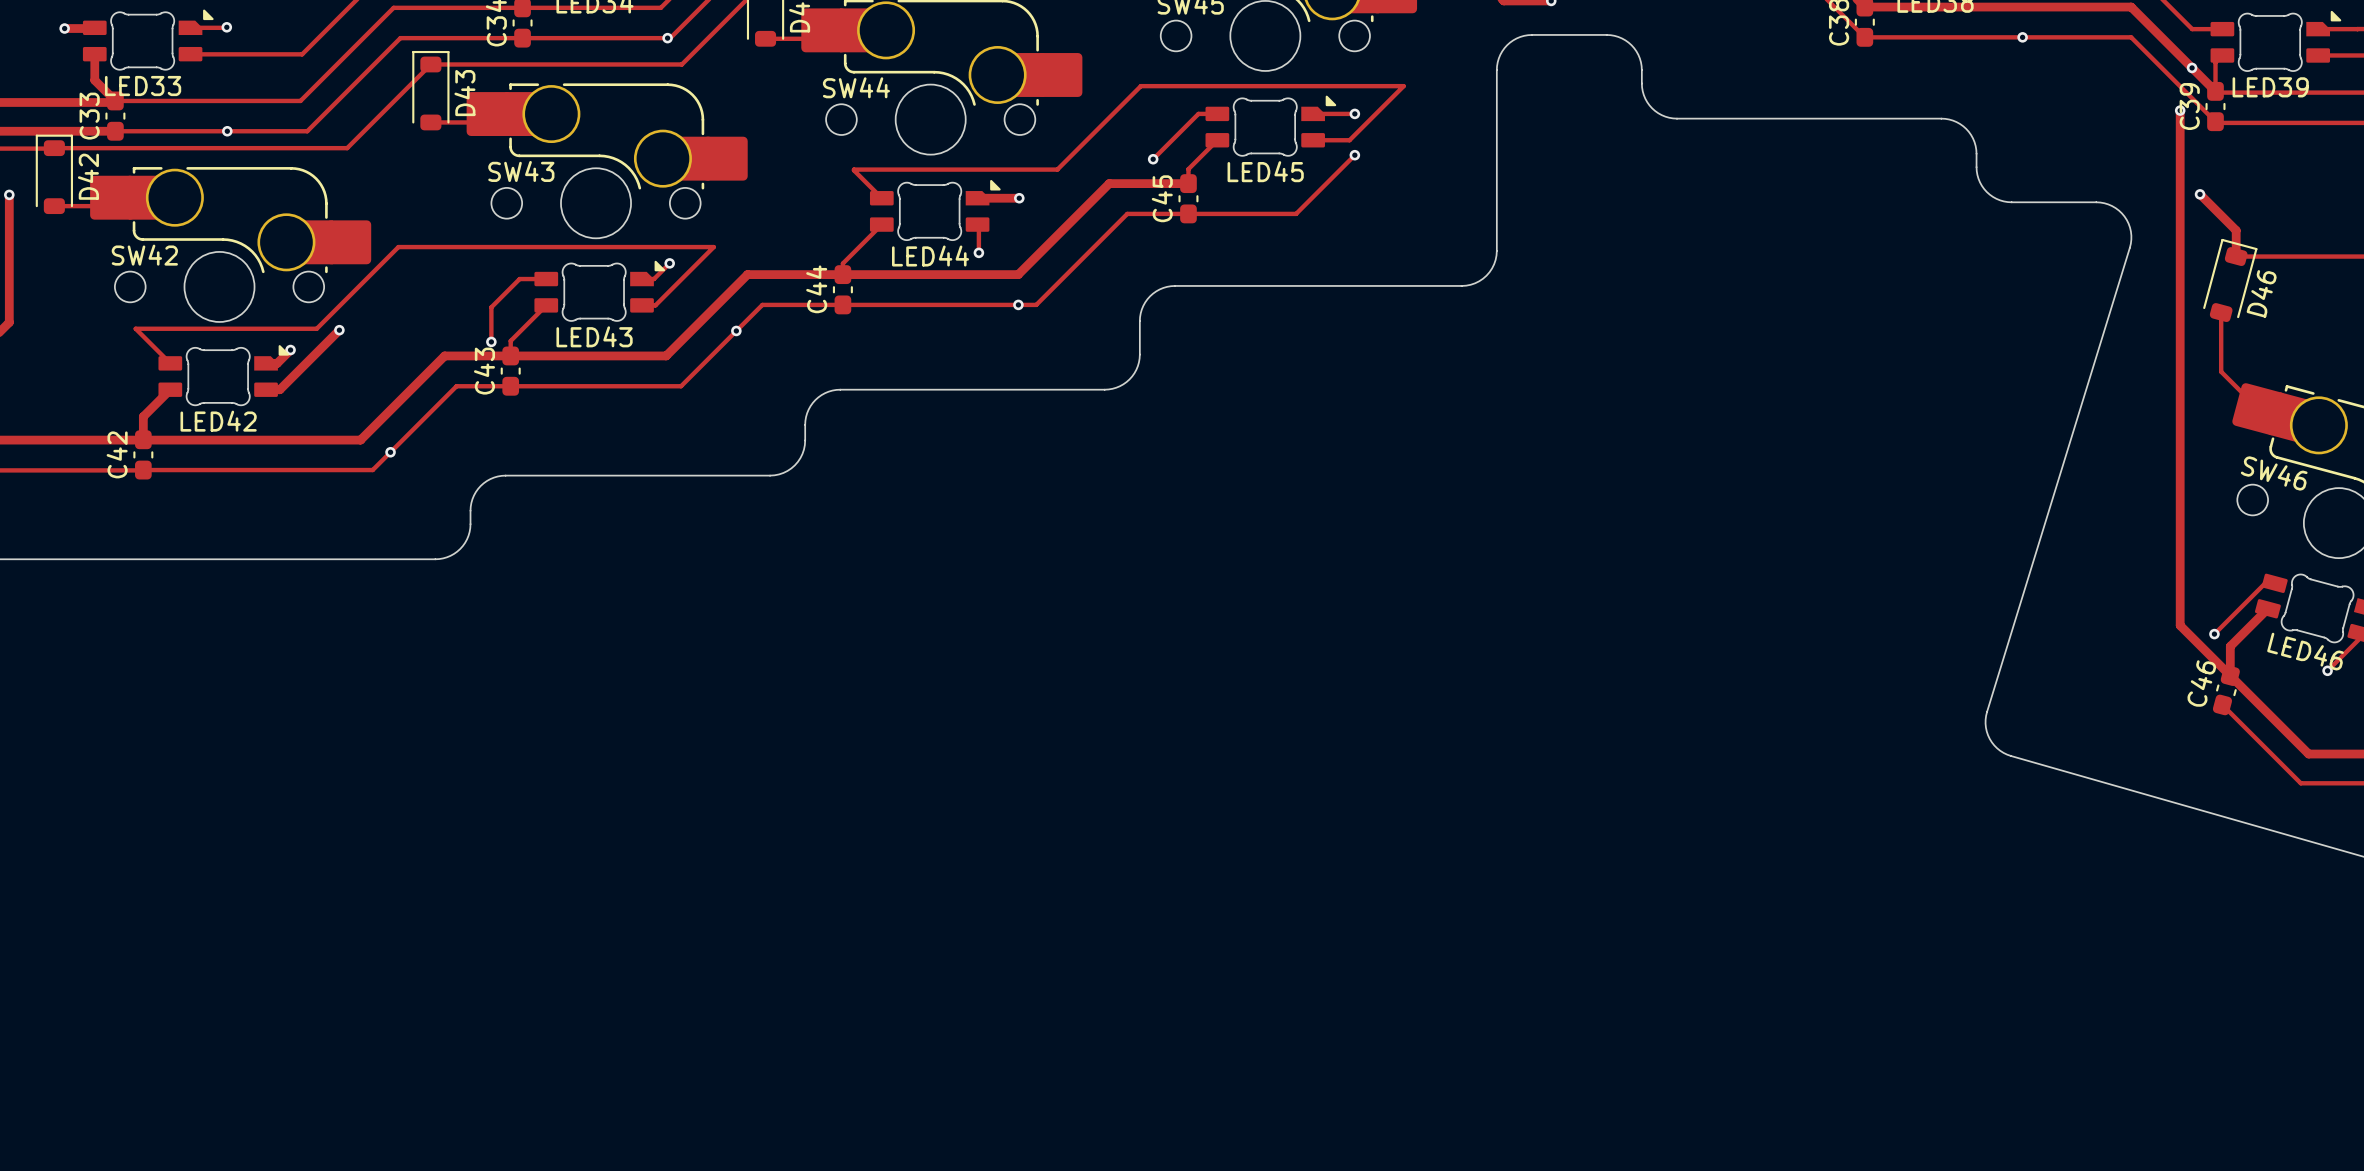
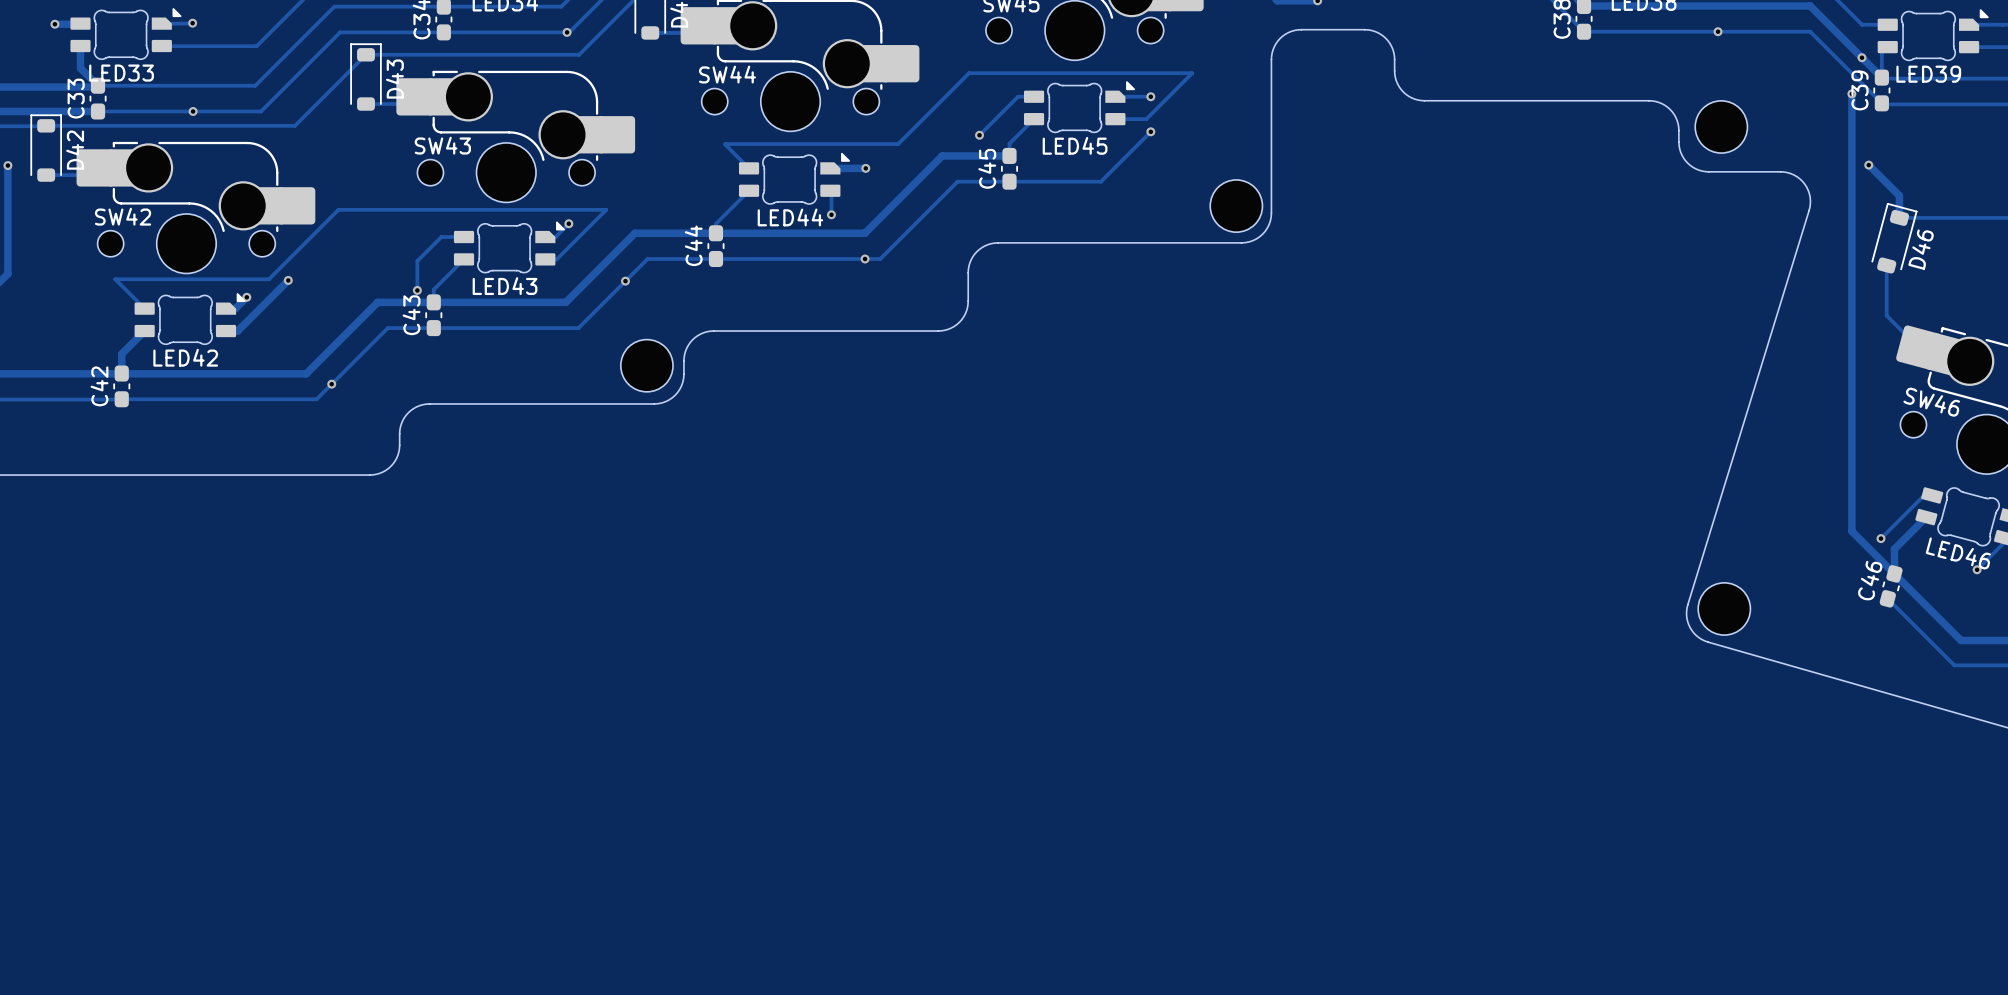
part: none -> (1721, 126)
part: none -> (1236, 206)
part: none -> (646, 365)
part: none -> (1724, 608)

